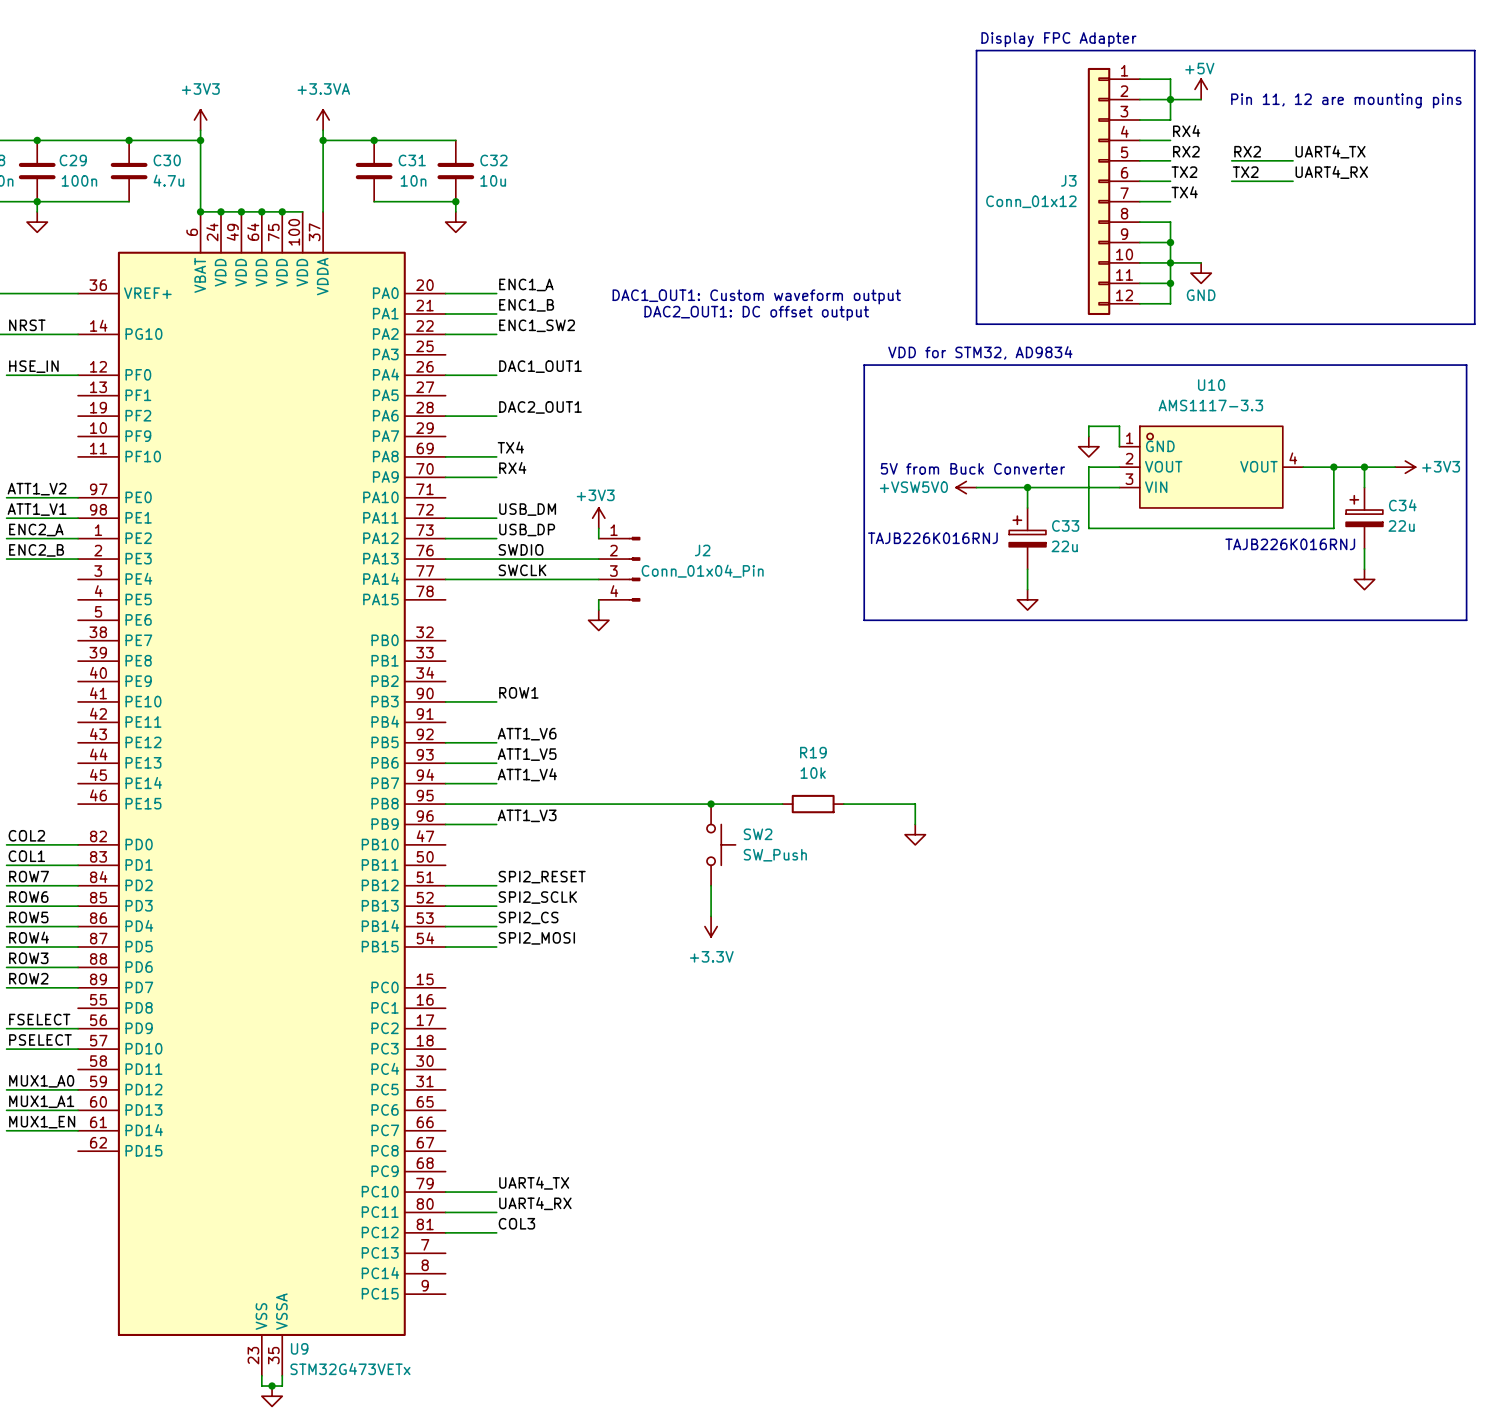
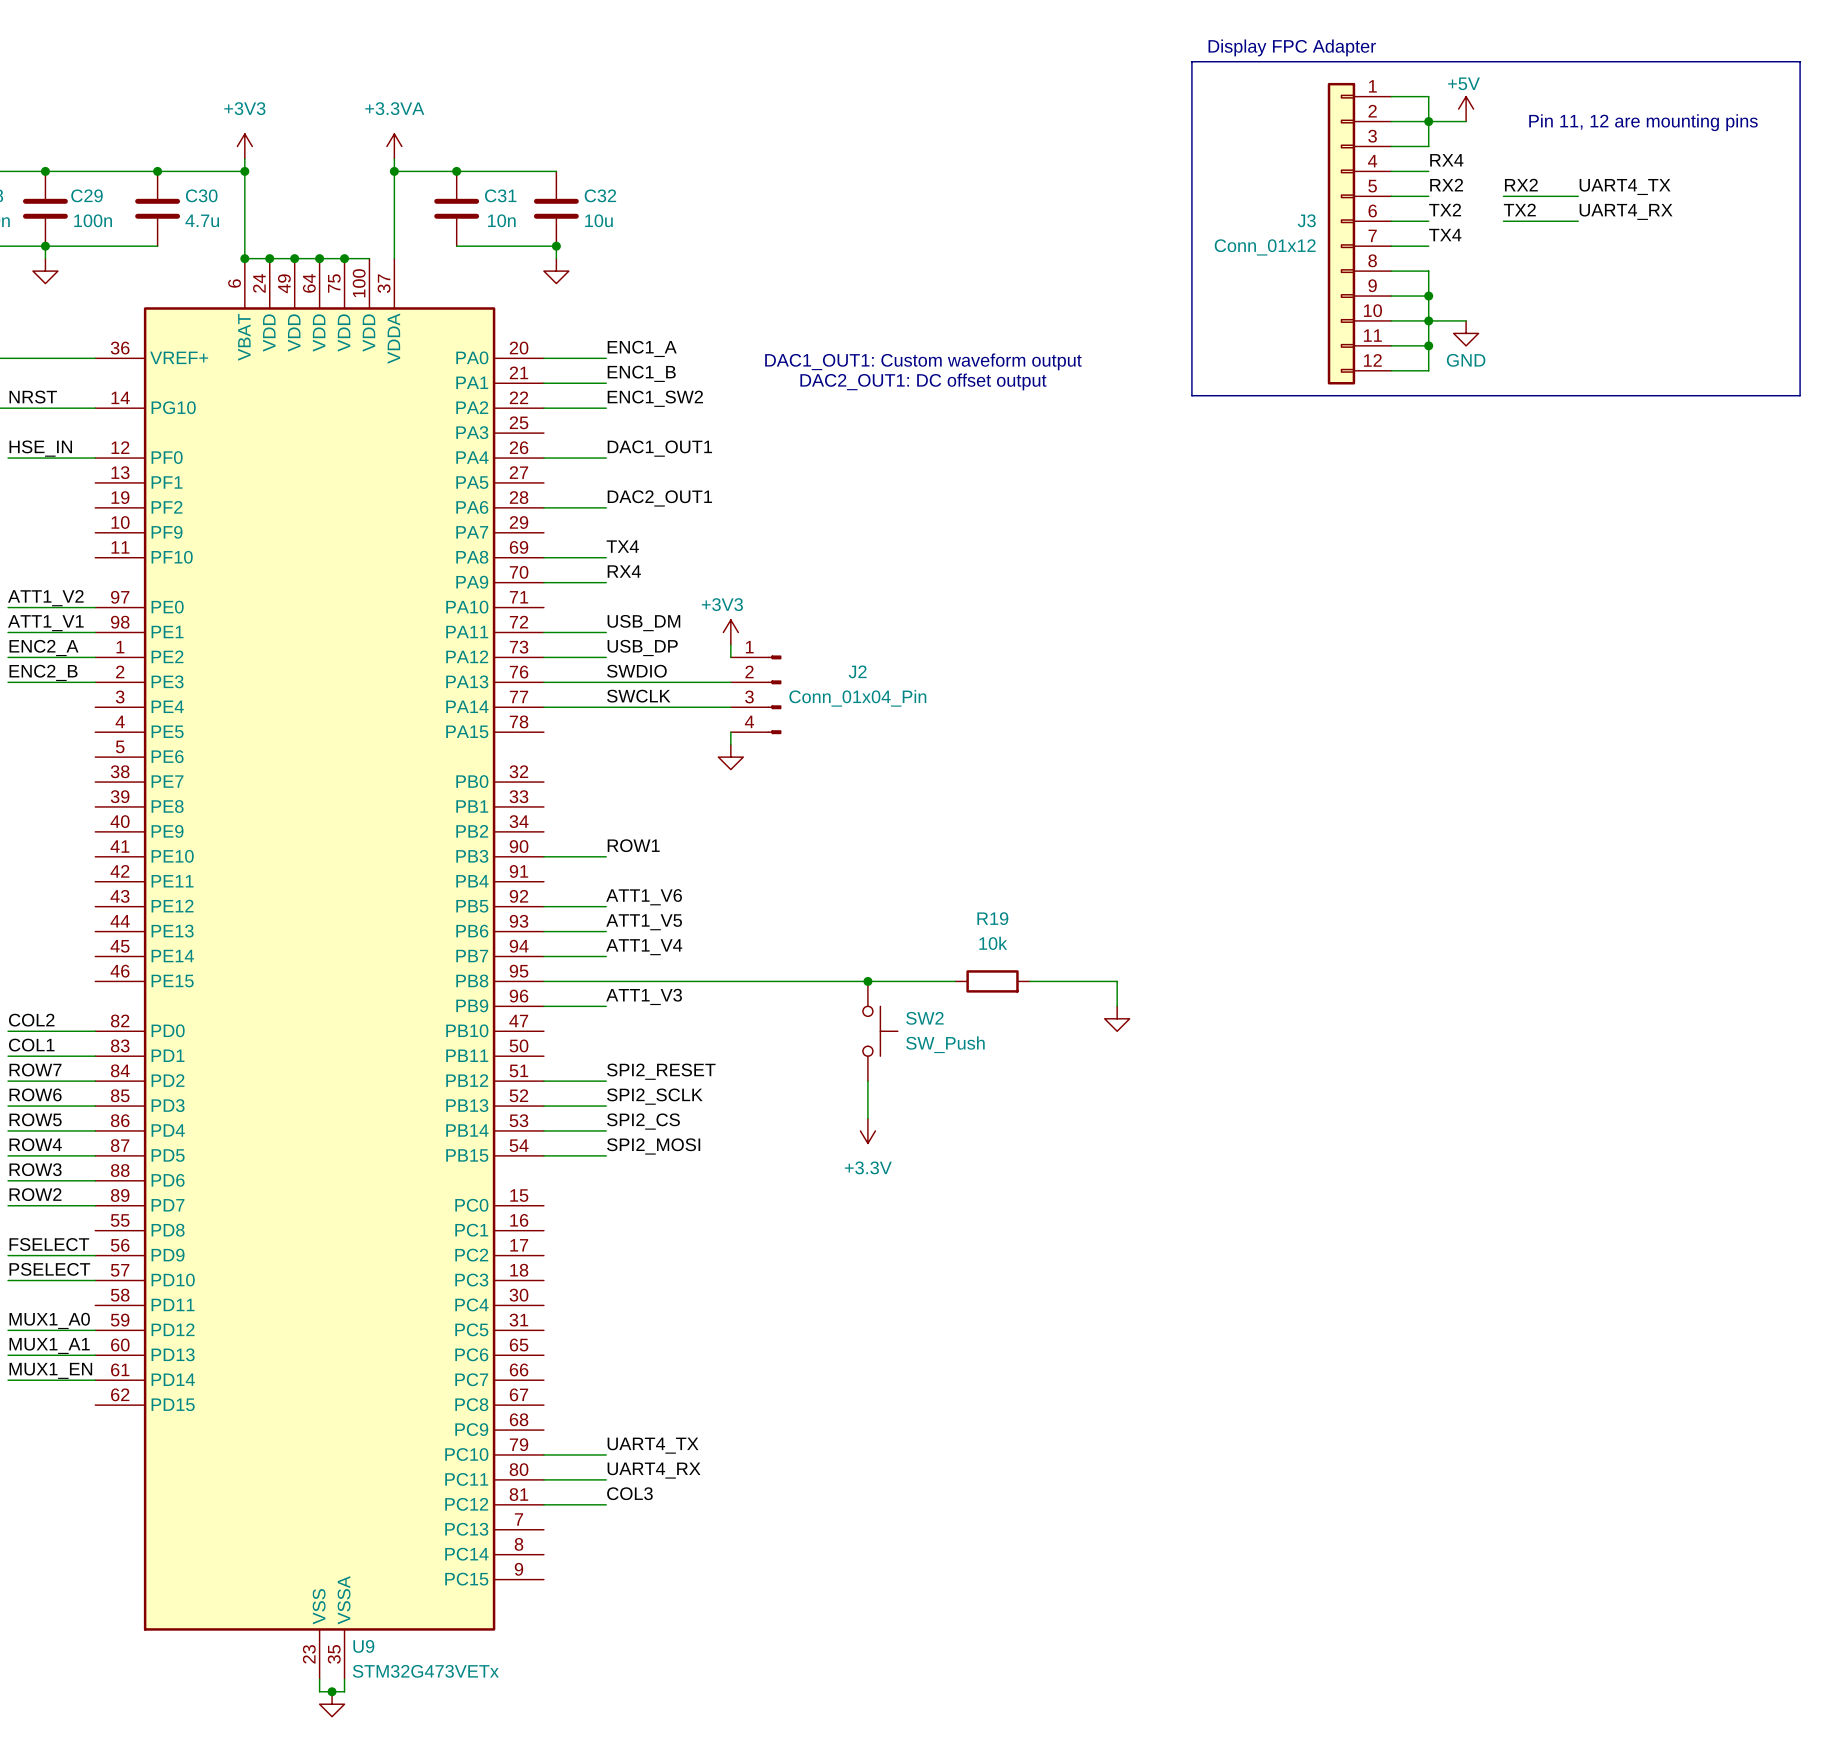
text: VDD for STM32, AD9834 (980, 352) -> none
line: (864, 365) (1466, 365) (1466, 620) (864, 620) (864, 365) -> none
wire: (1088, 436) (1088, 426) (1119, 426) (1119, 446) -> none
power symbol: (1088, 446) -> none
wire: (1119, 467) (1088, 467) (1088, 528) (1333, 528) (1333, 467) -> none
U10: AMS1117-3.3 (1211, 467) -> none
wire: (1303, 467) (1395, 467) -> none
junction: (1333, 467) -> none
wire: (1364, 467) (1364, 487) -> none
junction: (1364, 467) -> none
power symbol: +3V3 (1405, 467) -> none
text: 5V from Buck Converter (972, 468) -> none
power symbol: +VSW5V0 (966, 487) -> none
wire: (976, 487) (1119, 487) -> none
wire: (1027, 487) (1027, 507) -> none
junction: (1027, 487) -> none
C34: 22u (1364, 518) -> none
text: TAJB226K016RNJ (932, 538) -> none
C33: 22u (1027, 538) -> none
text: TAJB226K016RNJ (1290, 544) -> none
wire: (1364, 548) (1364, 569) -> none
wire: (1027, 569) (1027, 589) -> none
power symbol: (1364, 579) -> none
power symbol: (1027, 599) -> none

